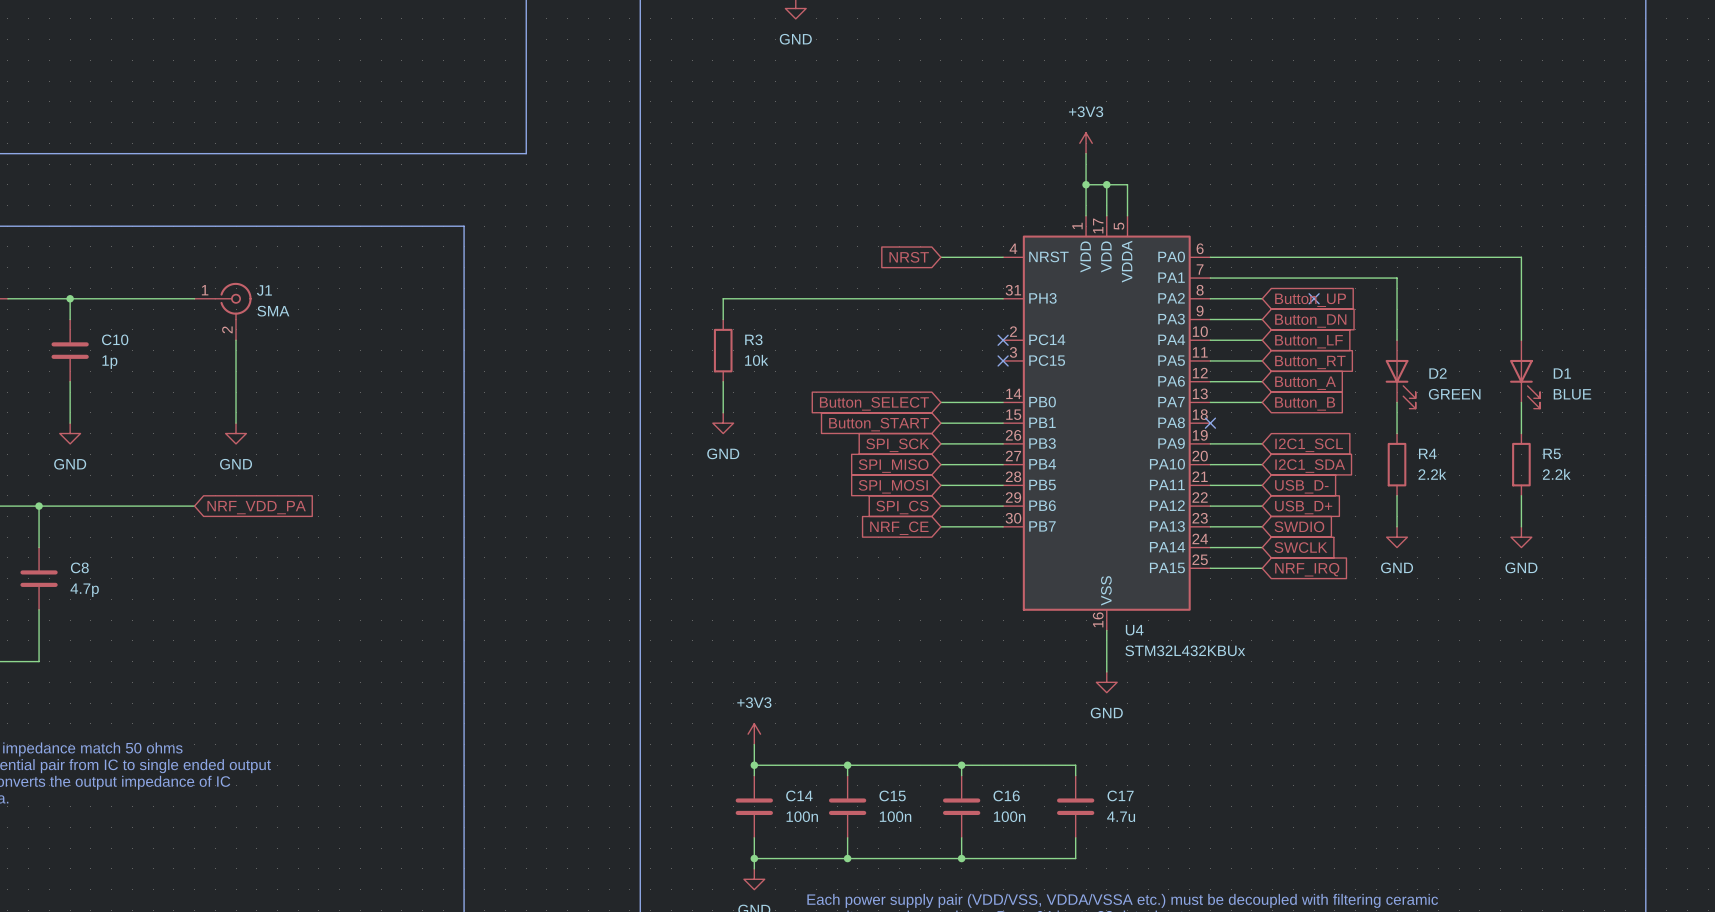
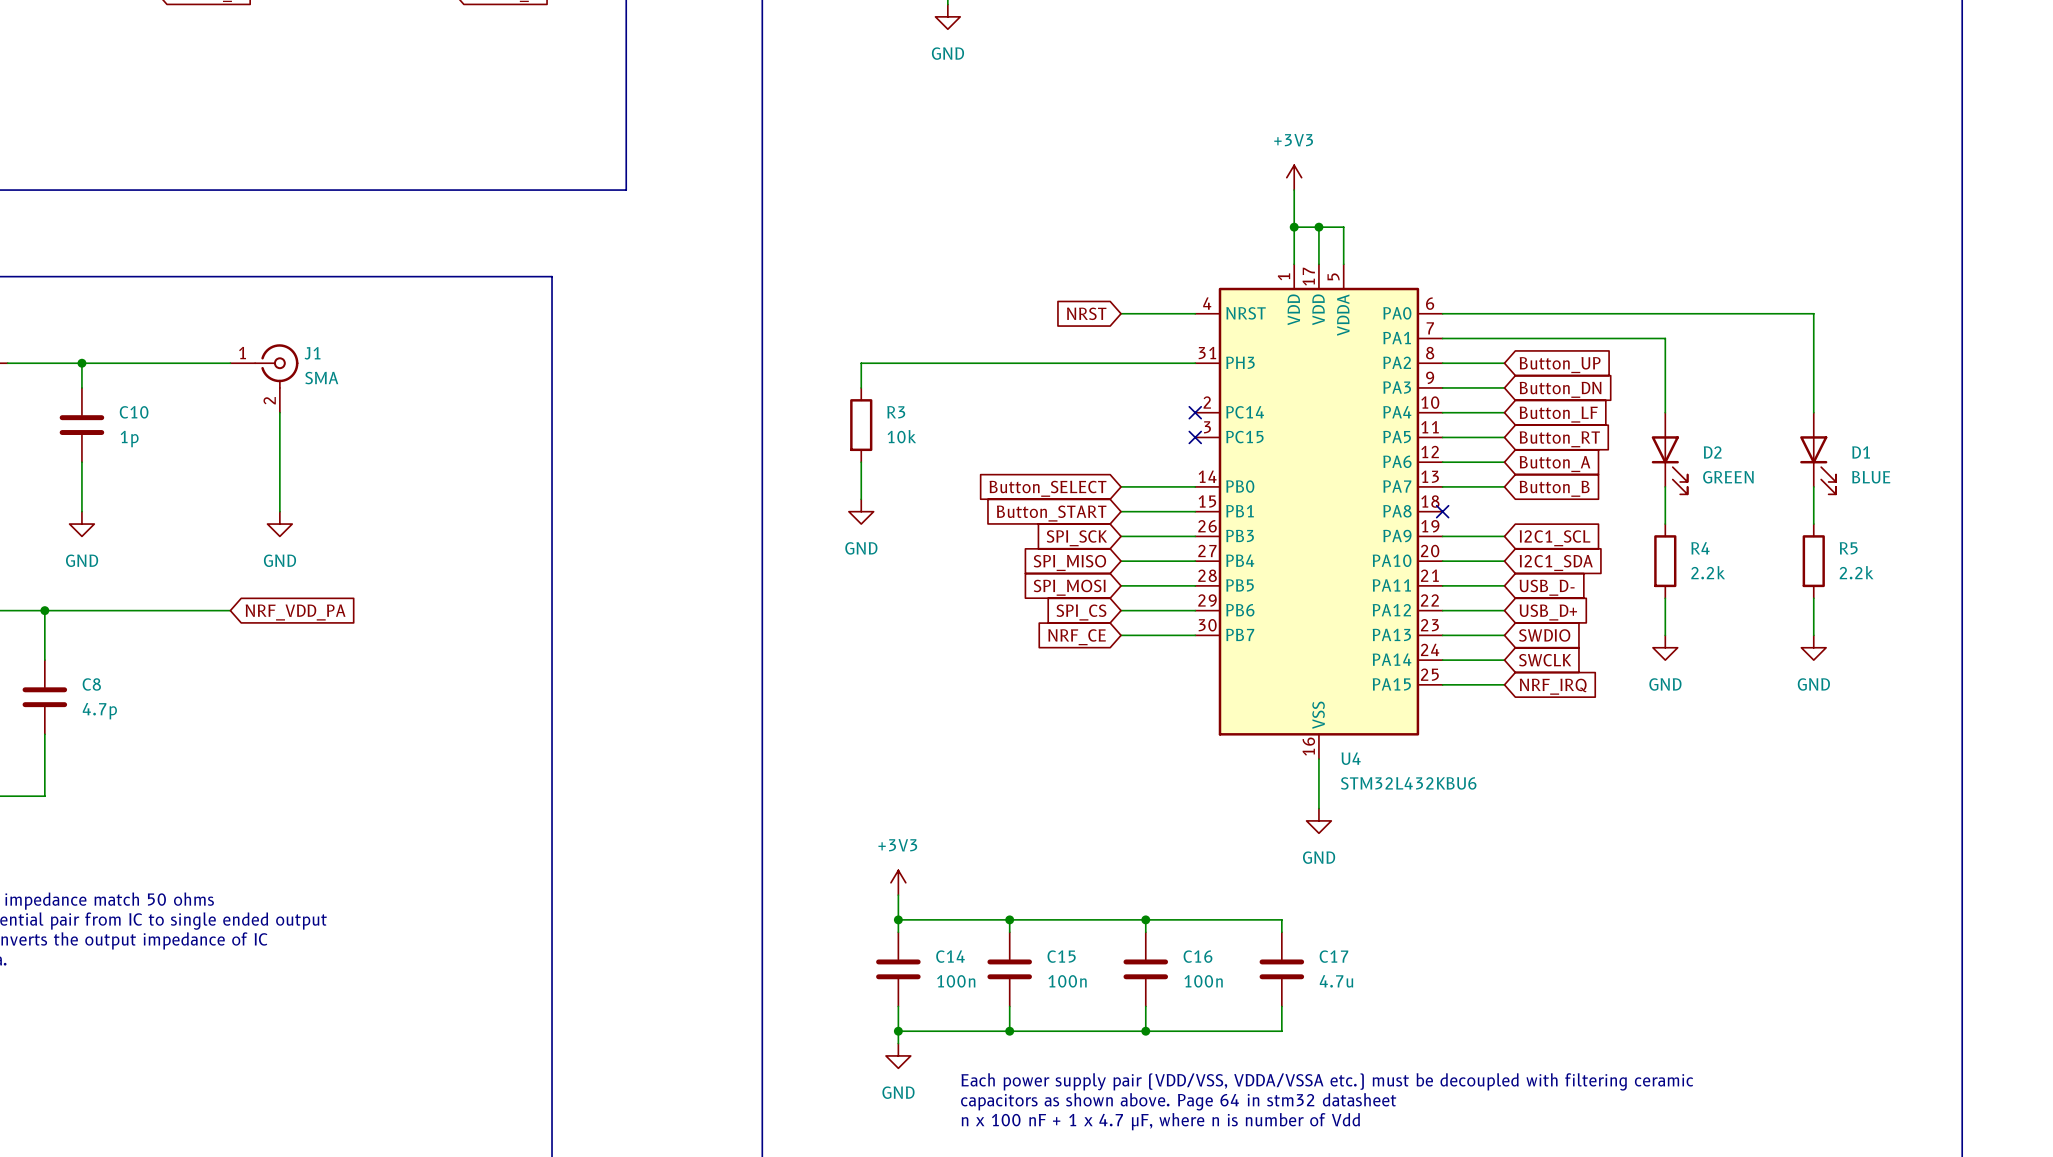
no-connect mark: (1314, 298) -> none
U4 value: STM32L432KBUx (1185, 650) -> STM32L432KBU6 (1408, 783)

